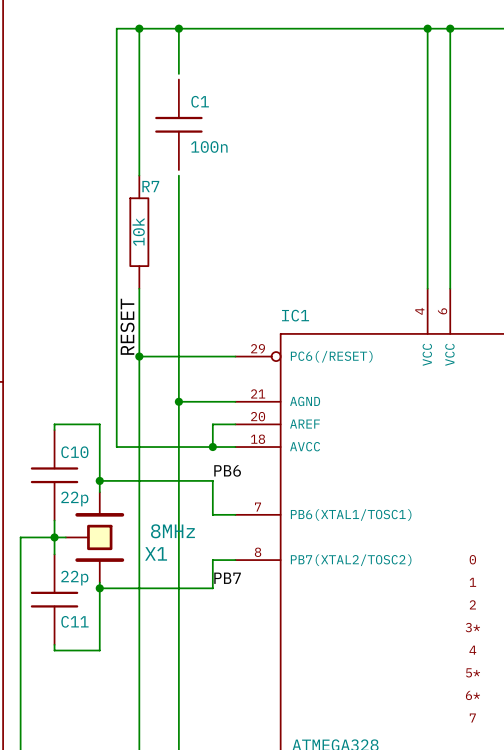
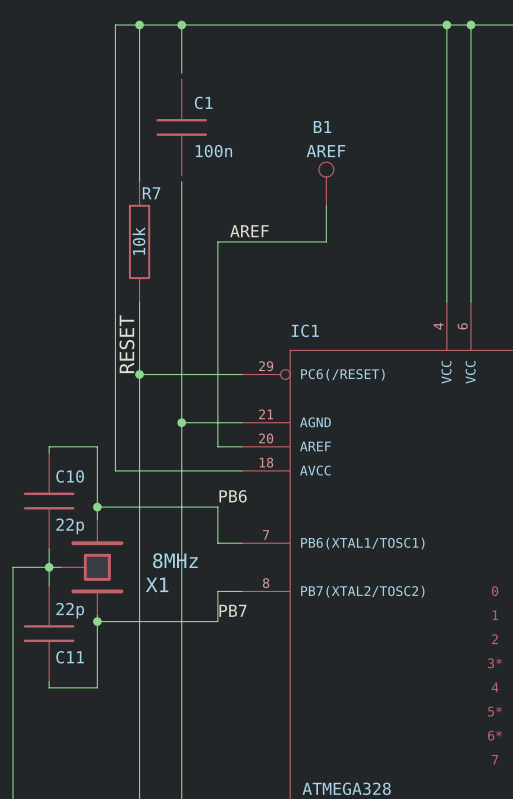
B1: none -> AREF (326, 183)
label: none -> AREF (249, 231)
wire: (212, 424) (212, 447) -> (217, 446) (217, 241) (326, 241) (326, 205)
junction: (212, 447) -> none

